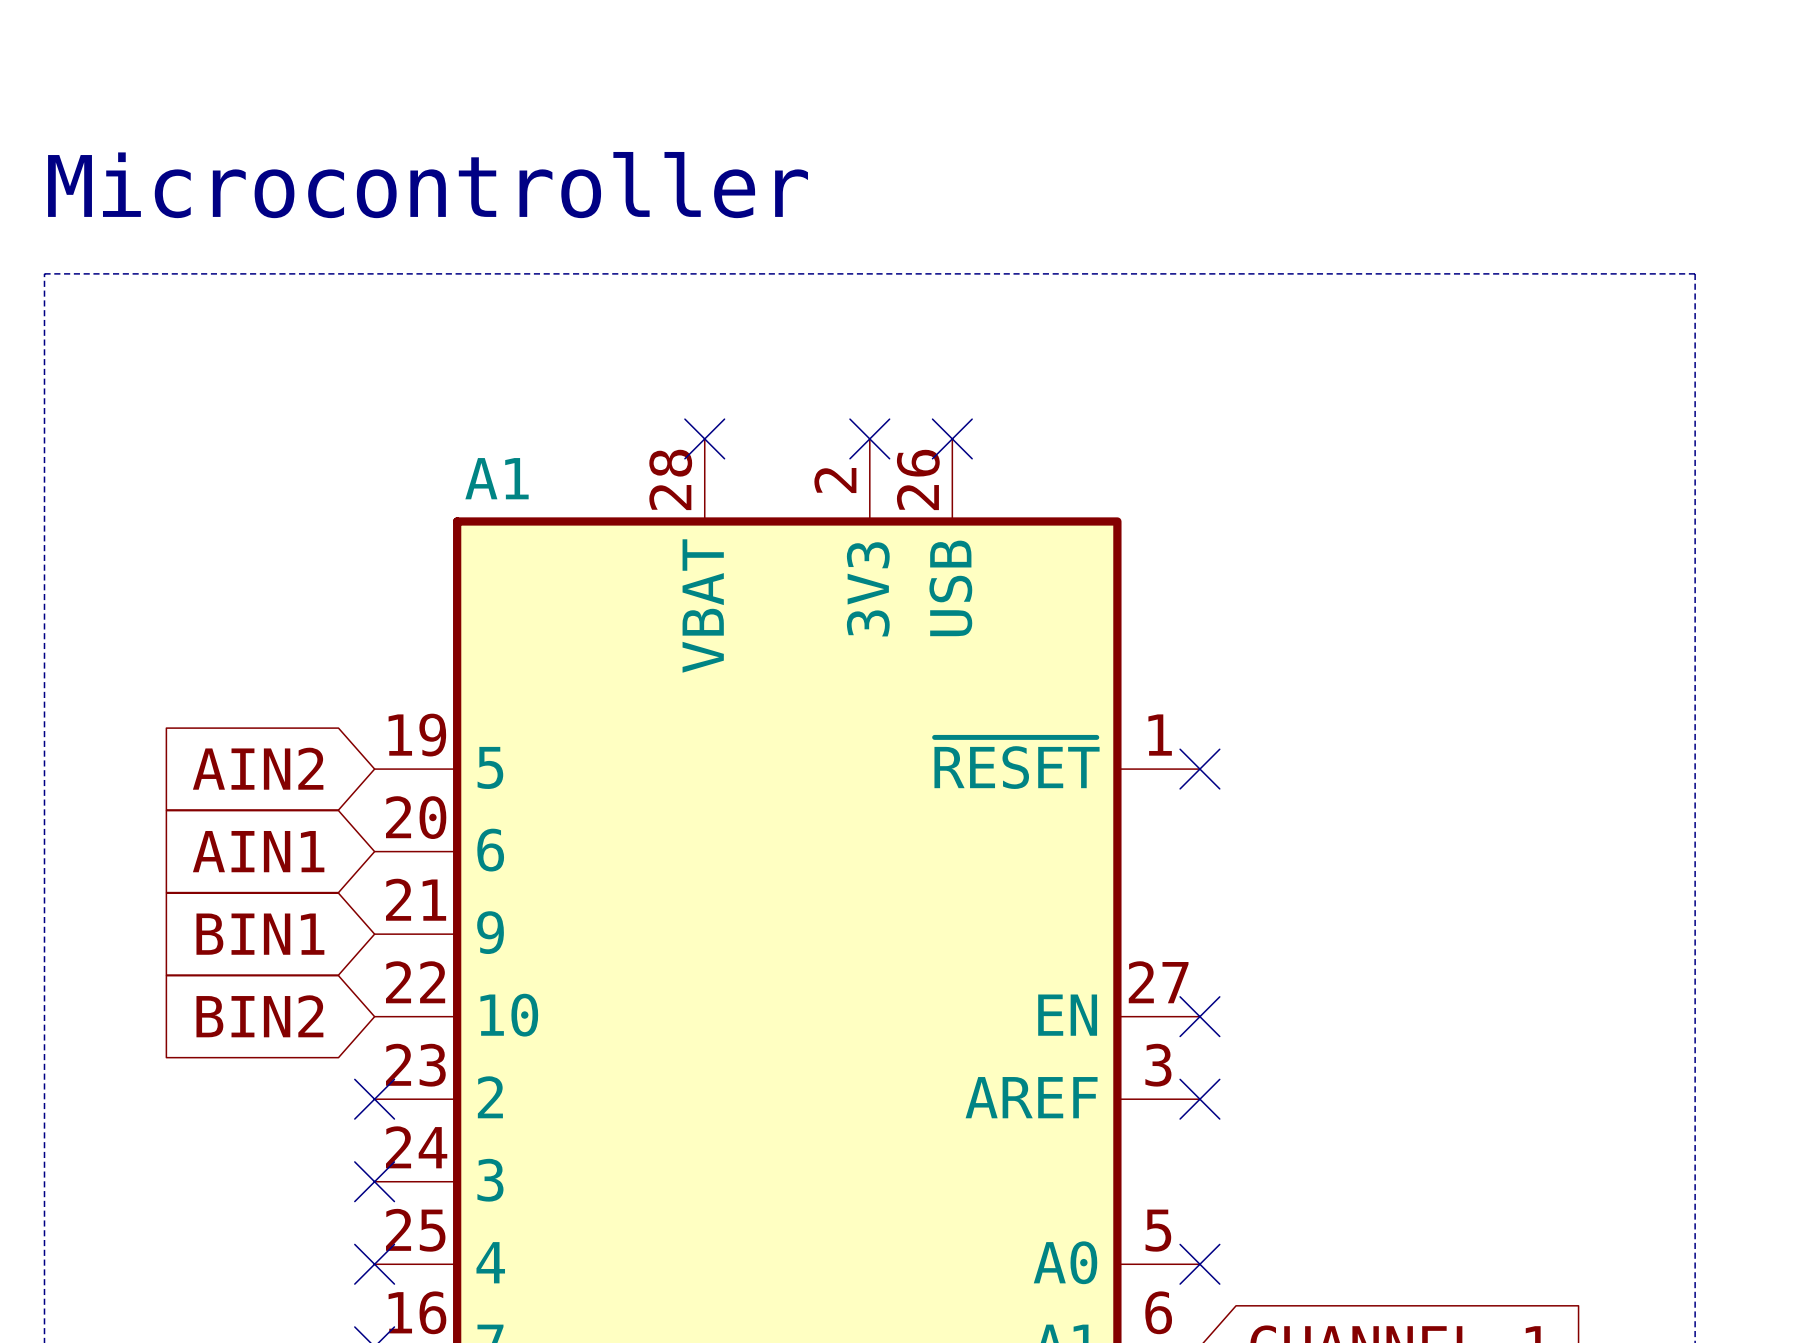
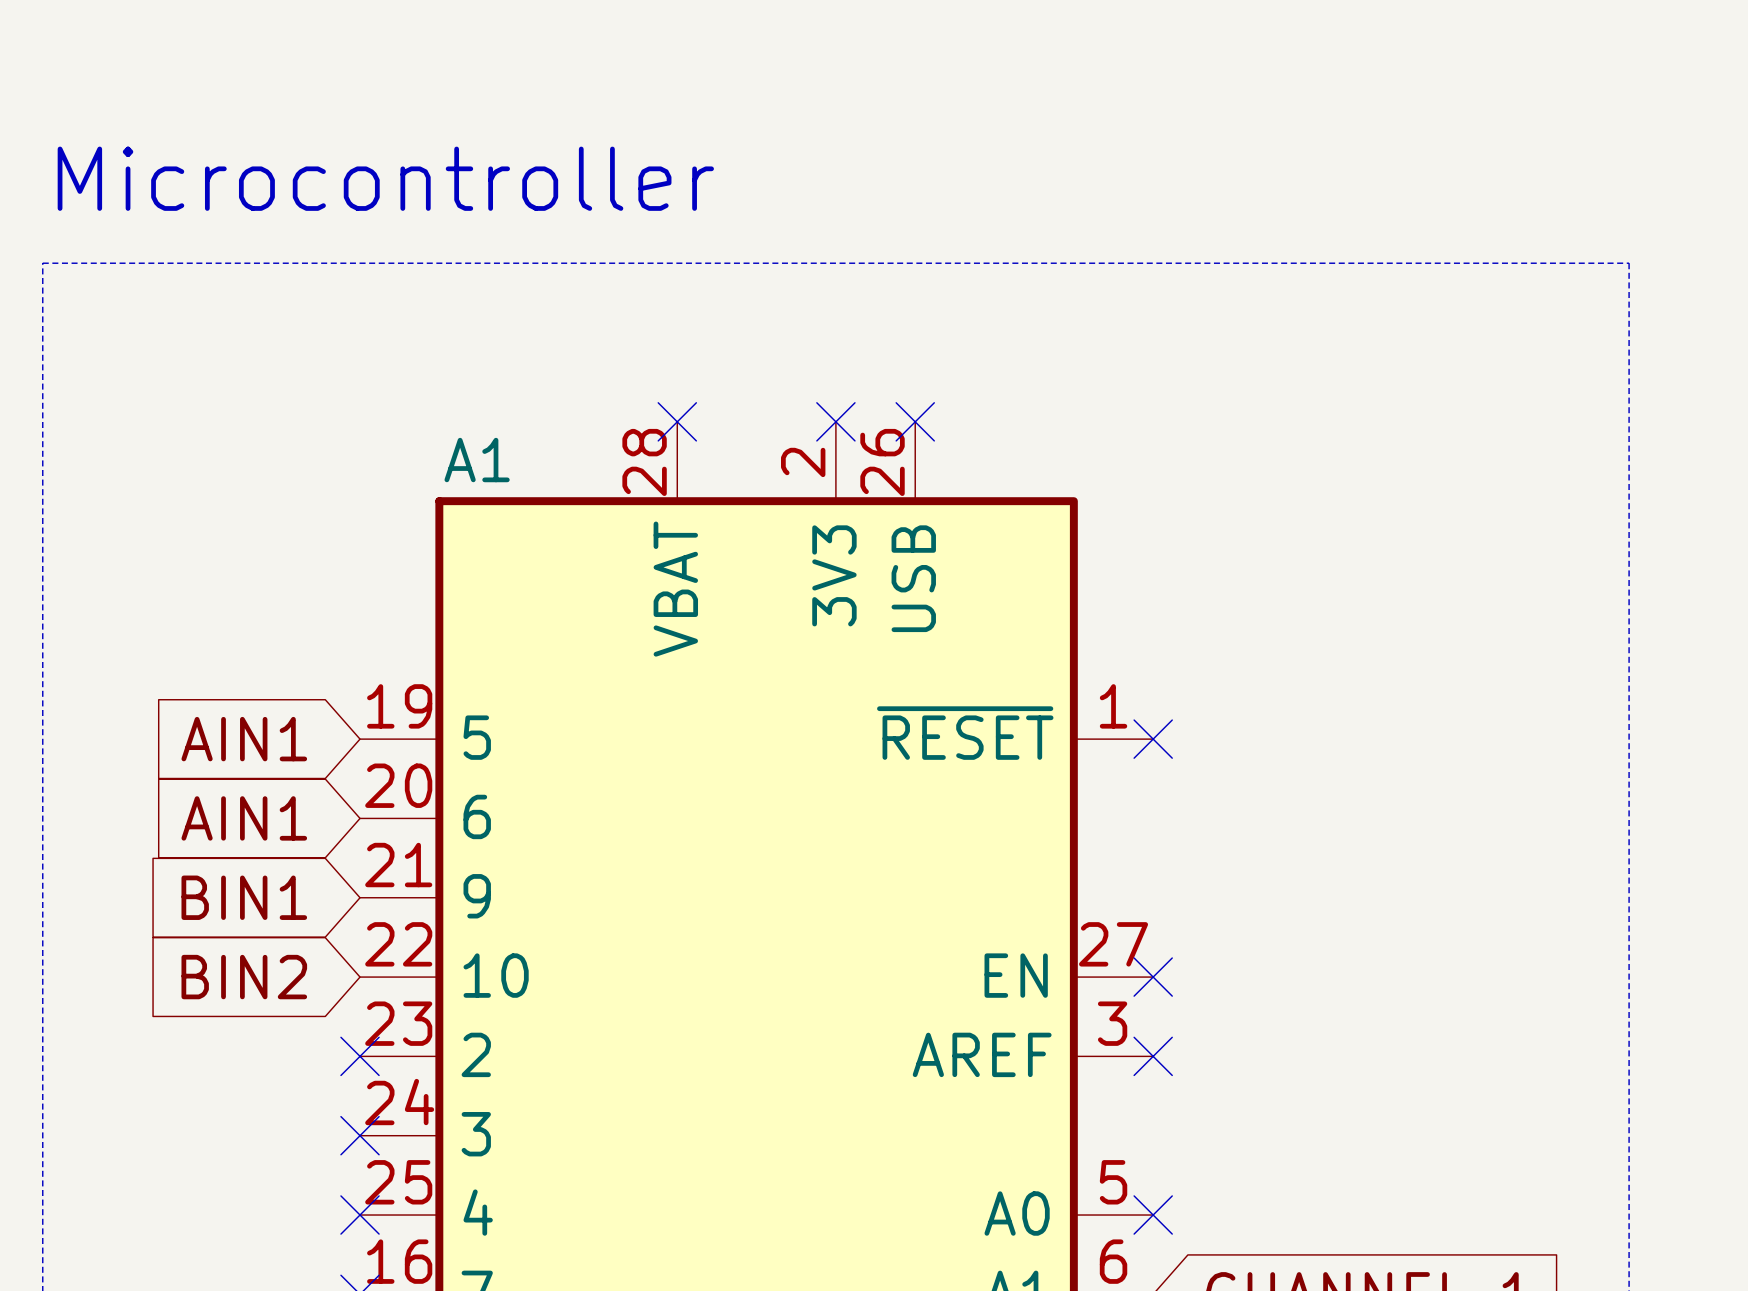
global label: AIN2 (258, 768) -> AIN1 (244, 739)

